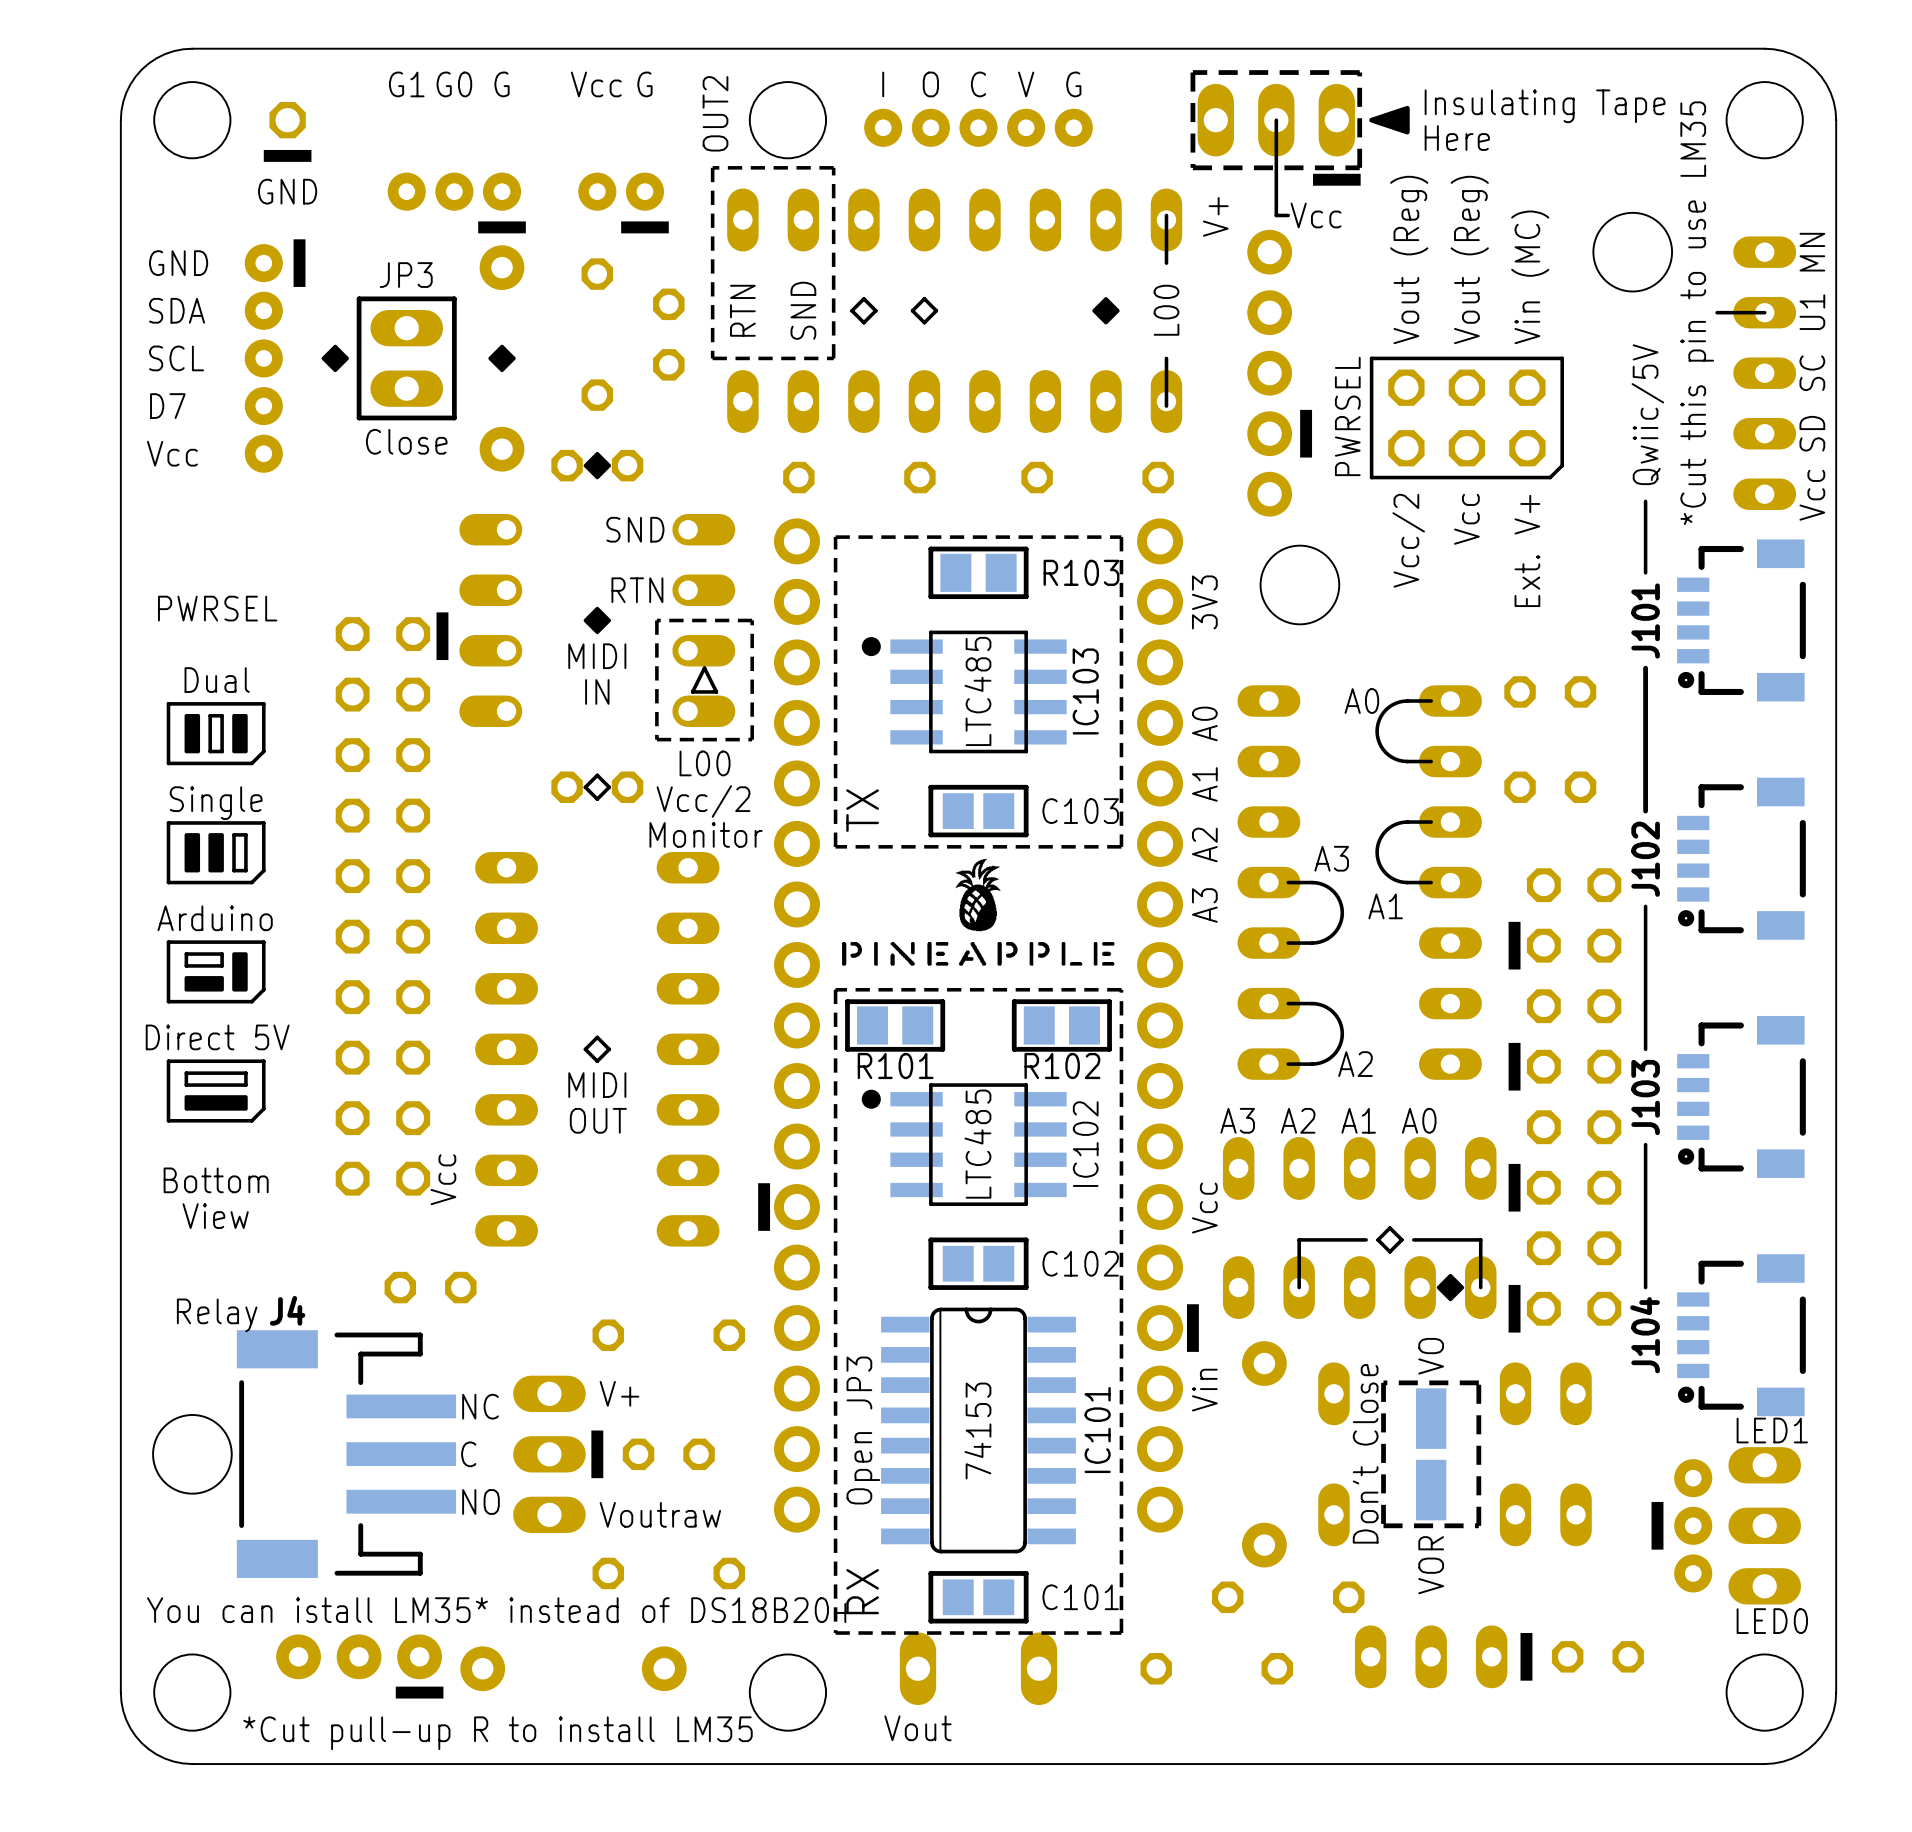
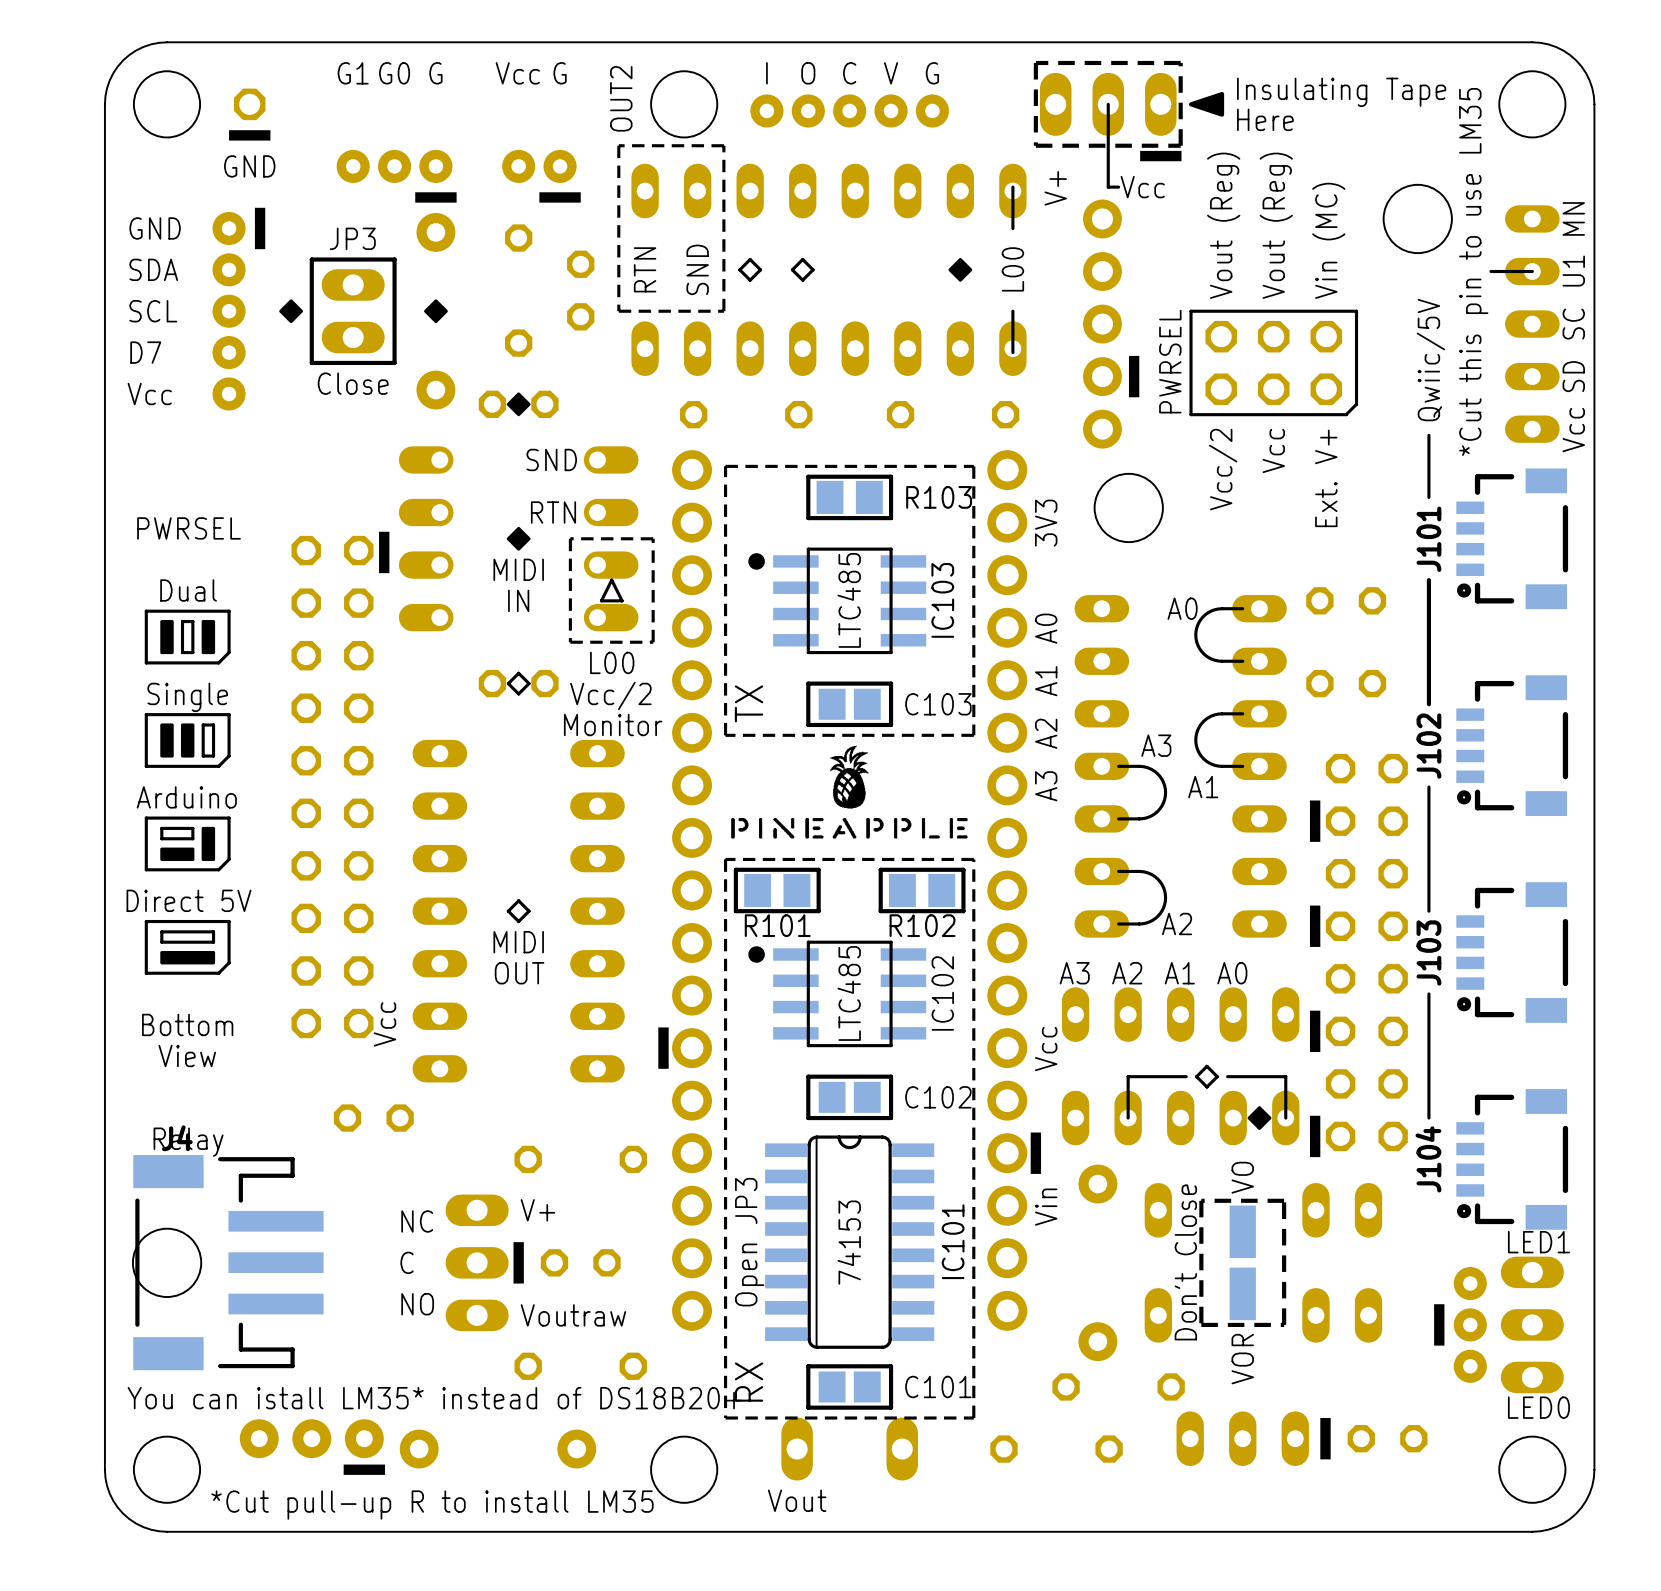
J4 position: (346, 1454) -> (228, 1262)

